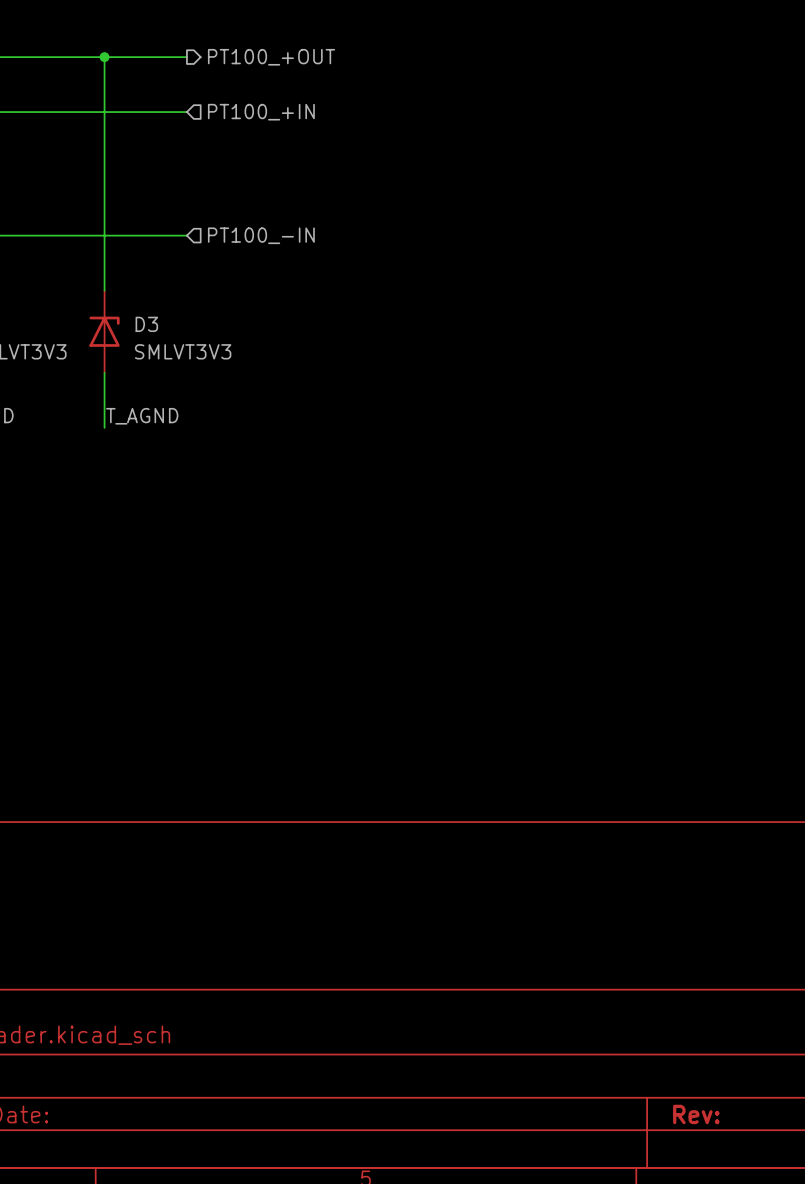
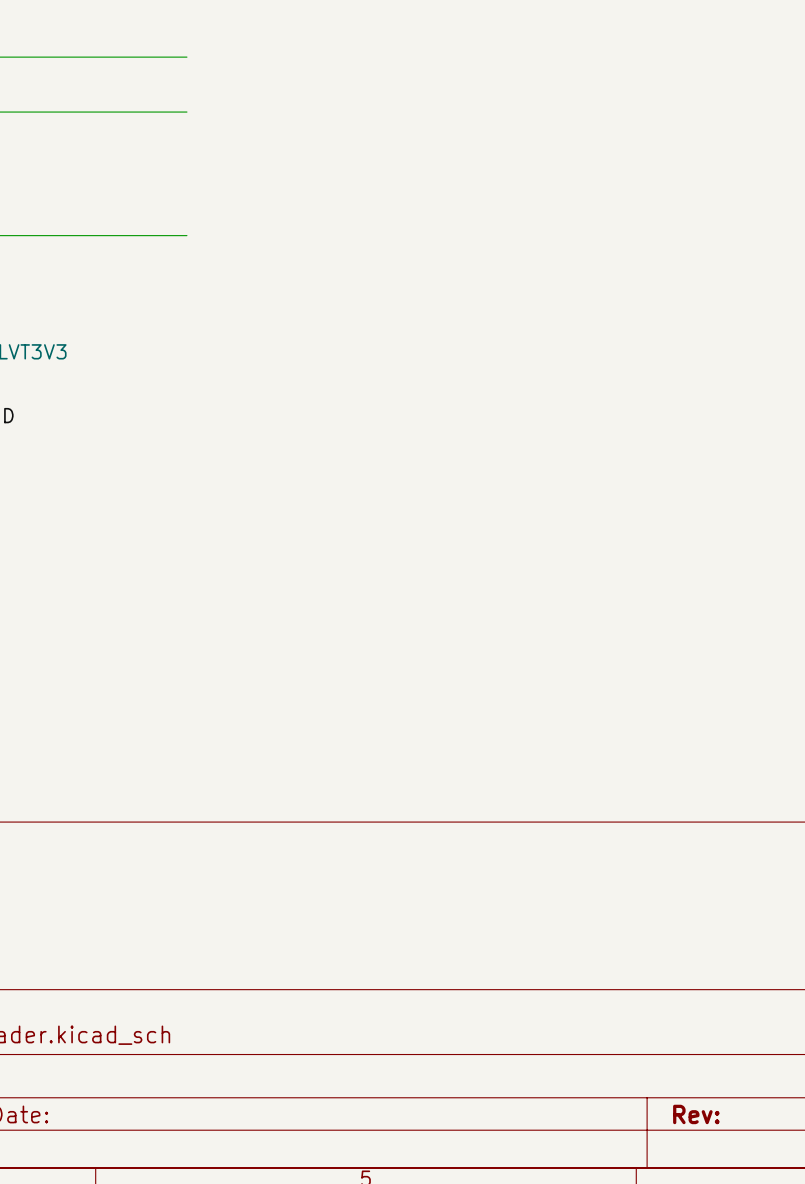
wire: (104, 57) (104, 290) -> none
junction: (104, 57) -> none
hierarchical label: PT100_+OUT (271, 57) -> none
hierarchical label: PT100_+IN (261, 112) -> none
hierarchical label: PT100_-IN (261, 235) -> none
D3: SMLVT3V3 (104, 331) -> none
wire: (104, 372) (104, 427) -> none
label: T_AGND (142, 416) -> none

